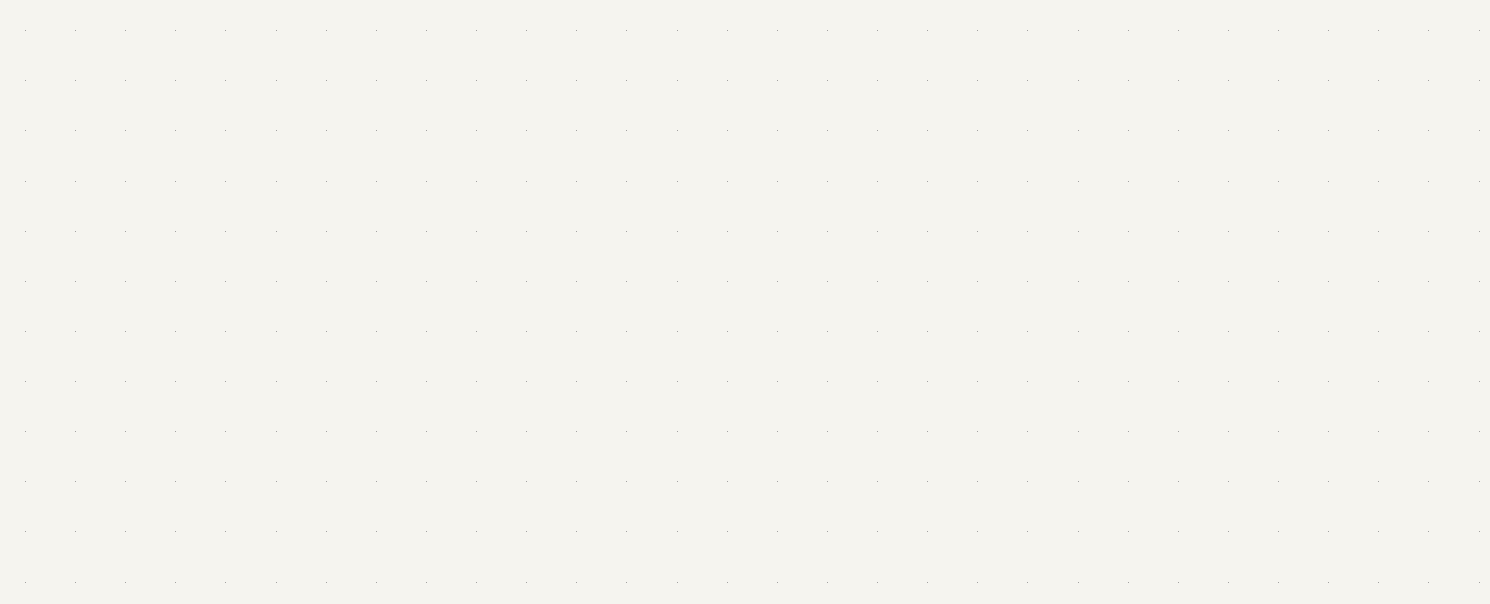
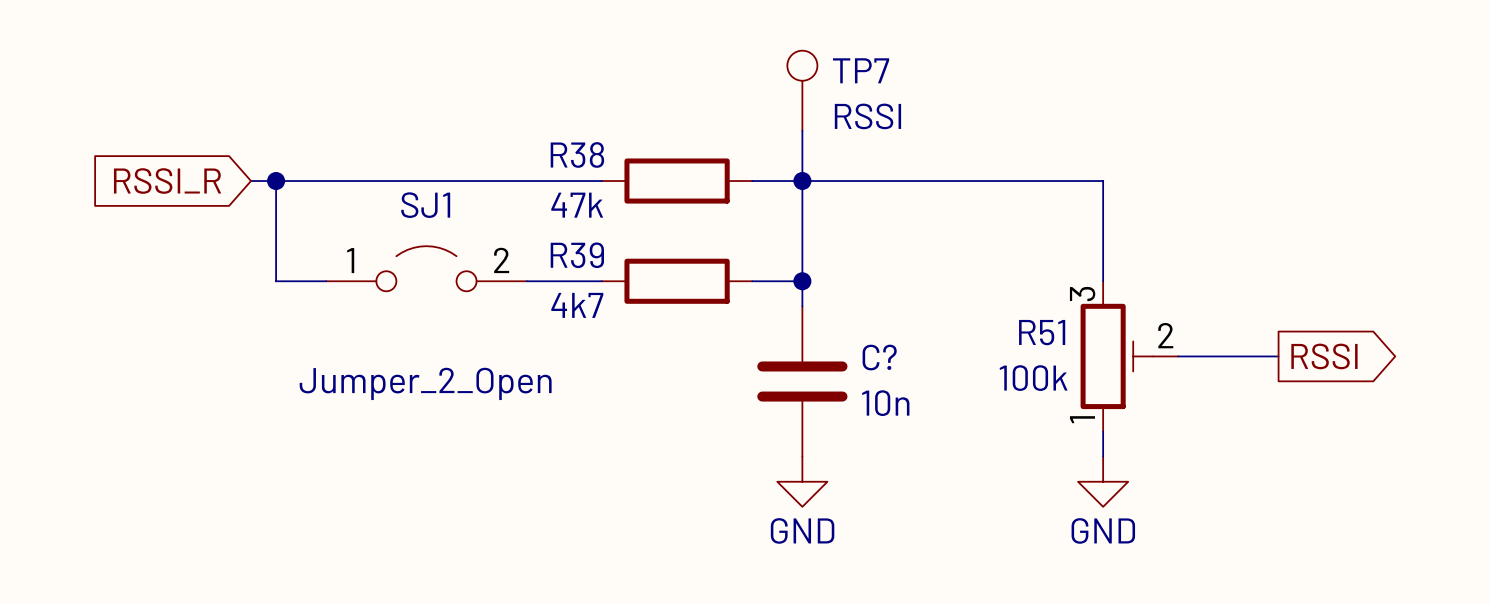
TP7: none -> RSSI (802, 90)
wire: none -> (802, 130) (802, 306)
global label: none -> RSSI_R (167, 181)
wire: none -> (251, 181) (601, 181)
wire: none -> (276, 181) (276, 281) (326, 281)
junction: none -> (276, 181)
R38: none -> 47k (677, 181)
wire: none -> (752, 181) (1103, 181) (1103, 281)
junction: none -> (802, 181)
SJ1: none -> Jumper_2_Open (426, 268)
wire: none -> (526, 281) (601, 281)
R39: none -> 4k7 (677, 281)
wire: none -> (752, 281) (802, 281)
junction: none -> (802, 281)
R51: none -> 100k (1129, 356)
wire: none -> (1178, 356) (1278, 356)
global label: none -> RSSI (1324, 356)
C?: none -> 10n (802, 381)
wire: none -> (1103, 431) (1103, 456)
power symbol: none -> GND (802, 481)
power symbol: none -> GND (1103, 481)

